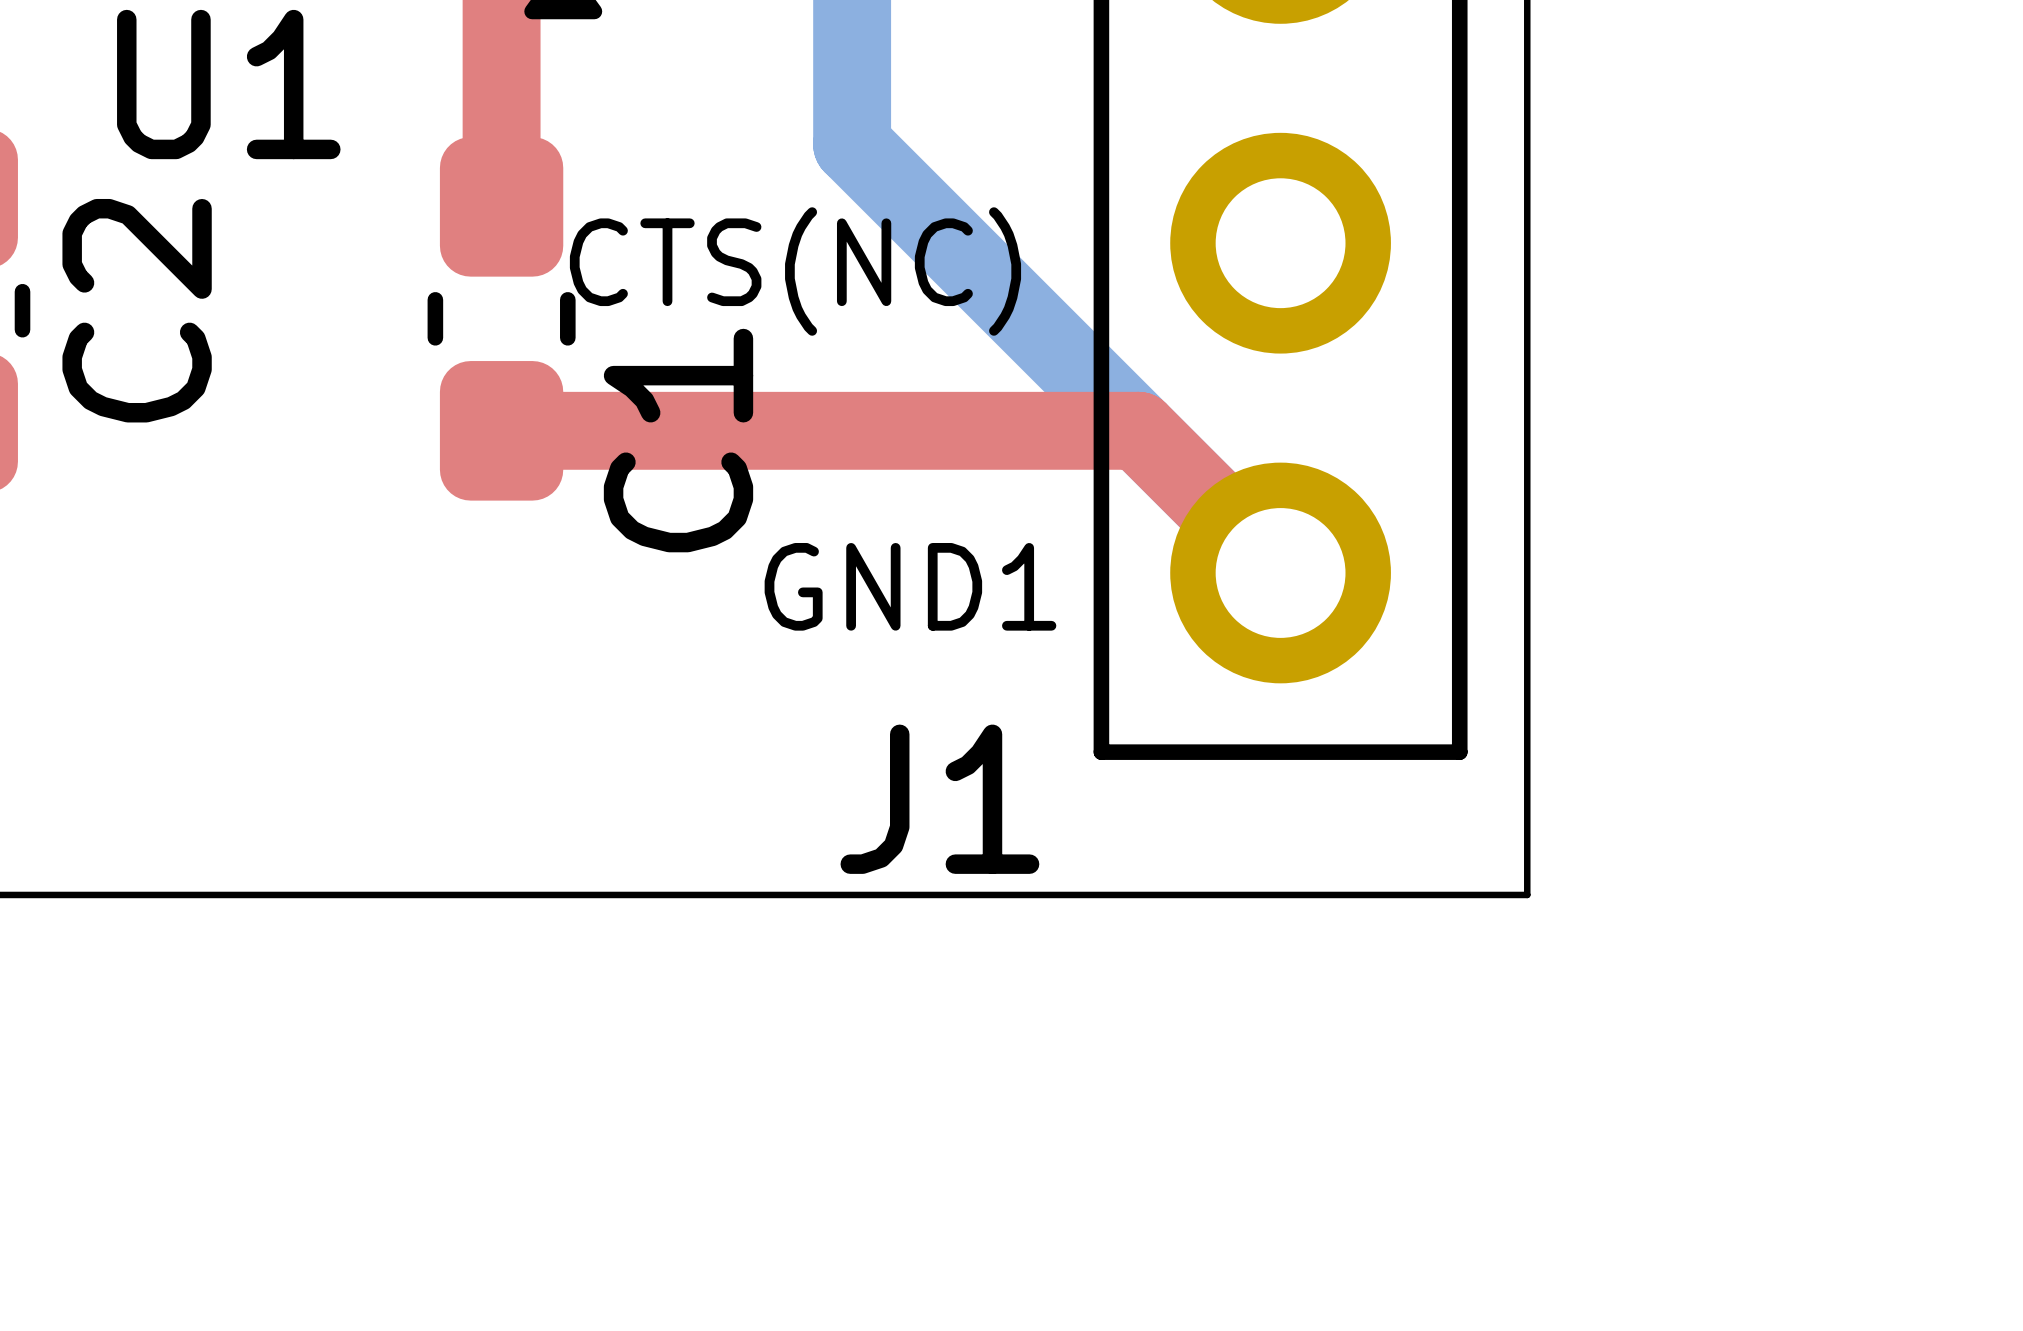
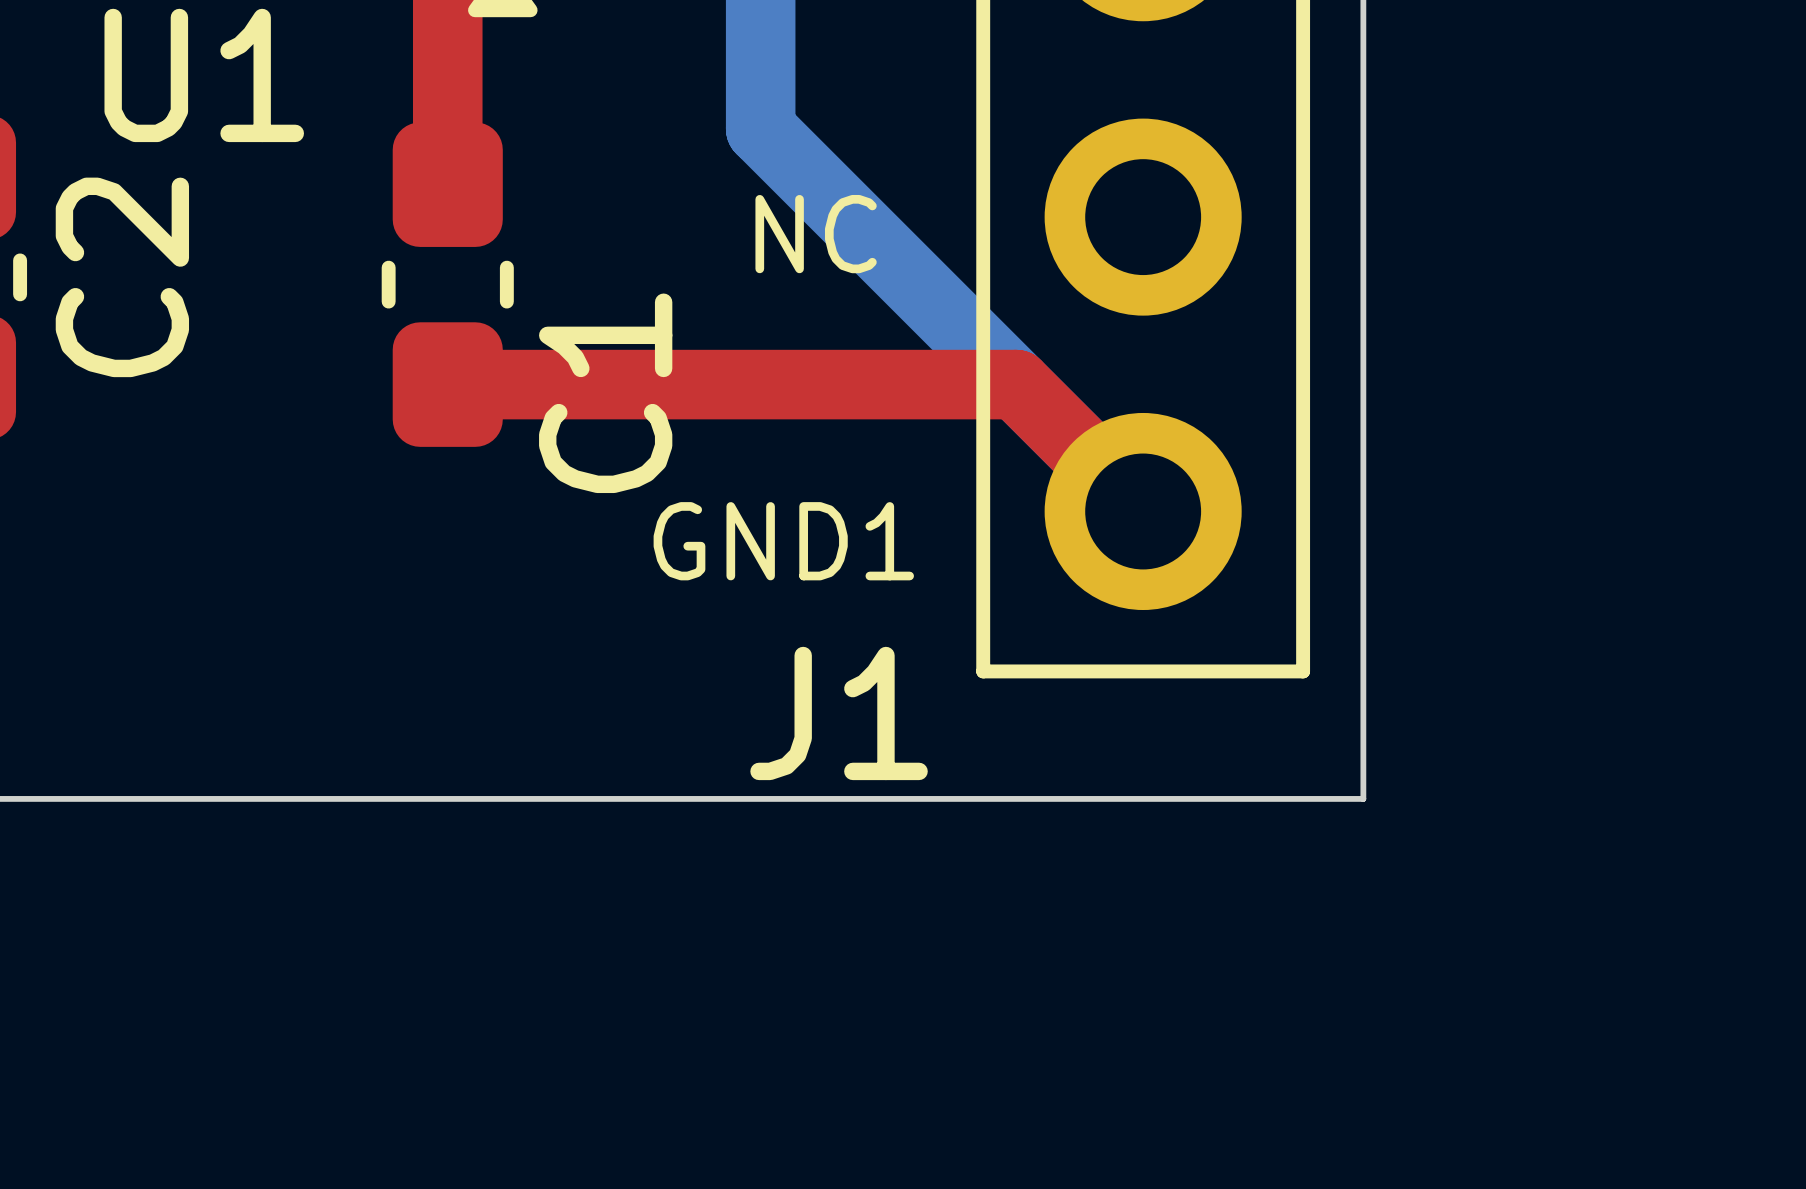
text: none -> NC (816, 234)
text: CTS(NC) (795, 271) -> none
text position: GND1 (910, 586) -> GND1 (783, 541)

